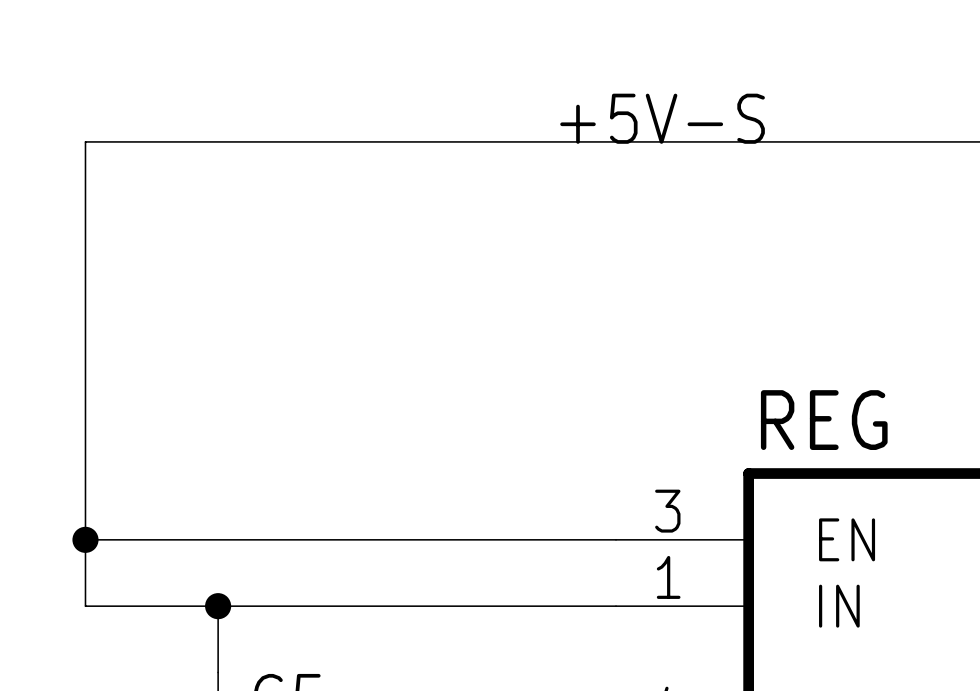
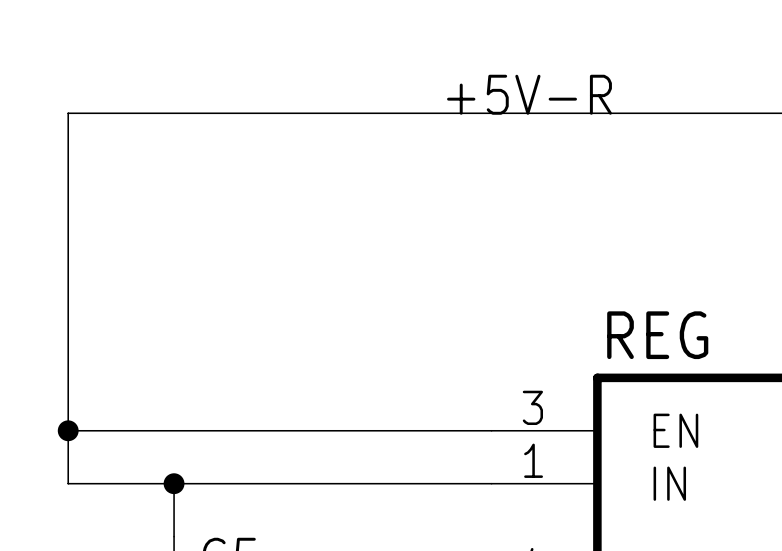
label: +5V-S (662, 118) -> +5V-R (529, 94)

